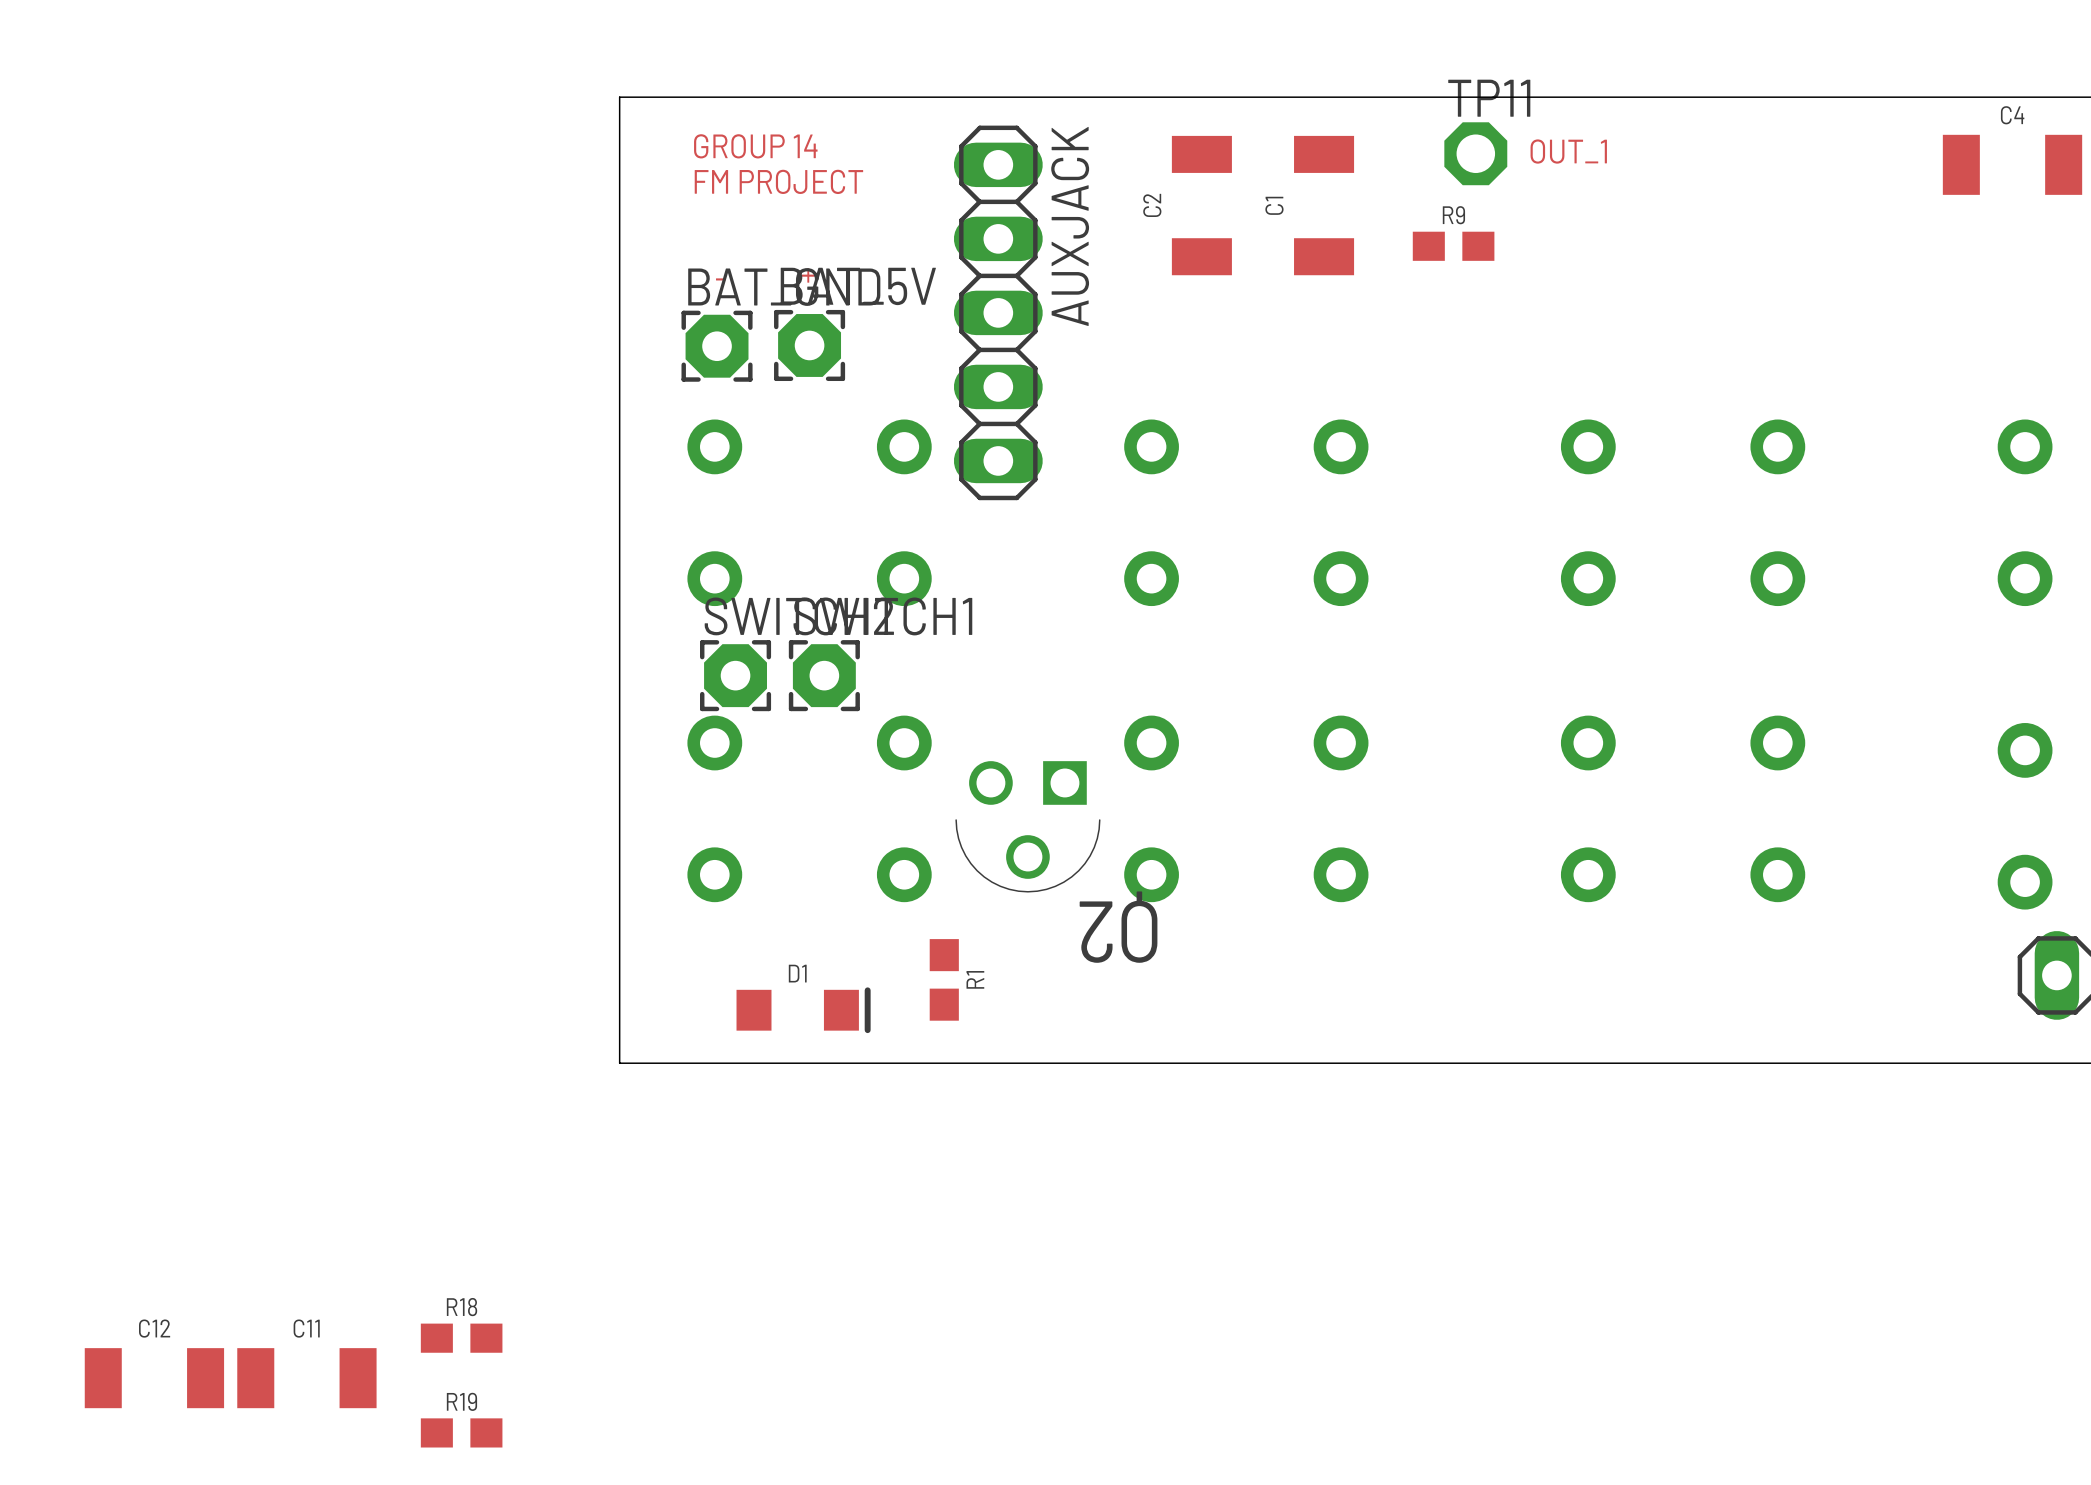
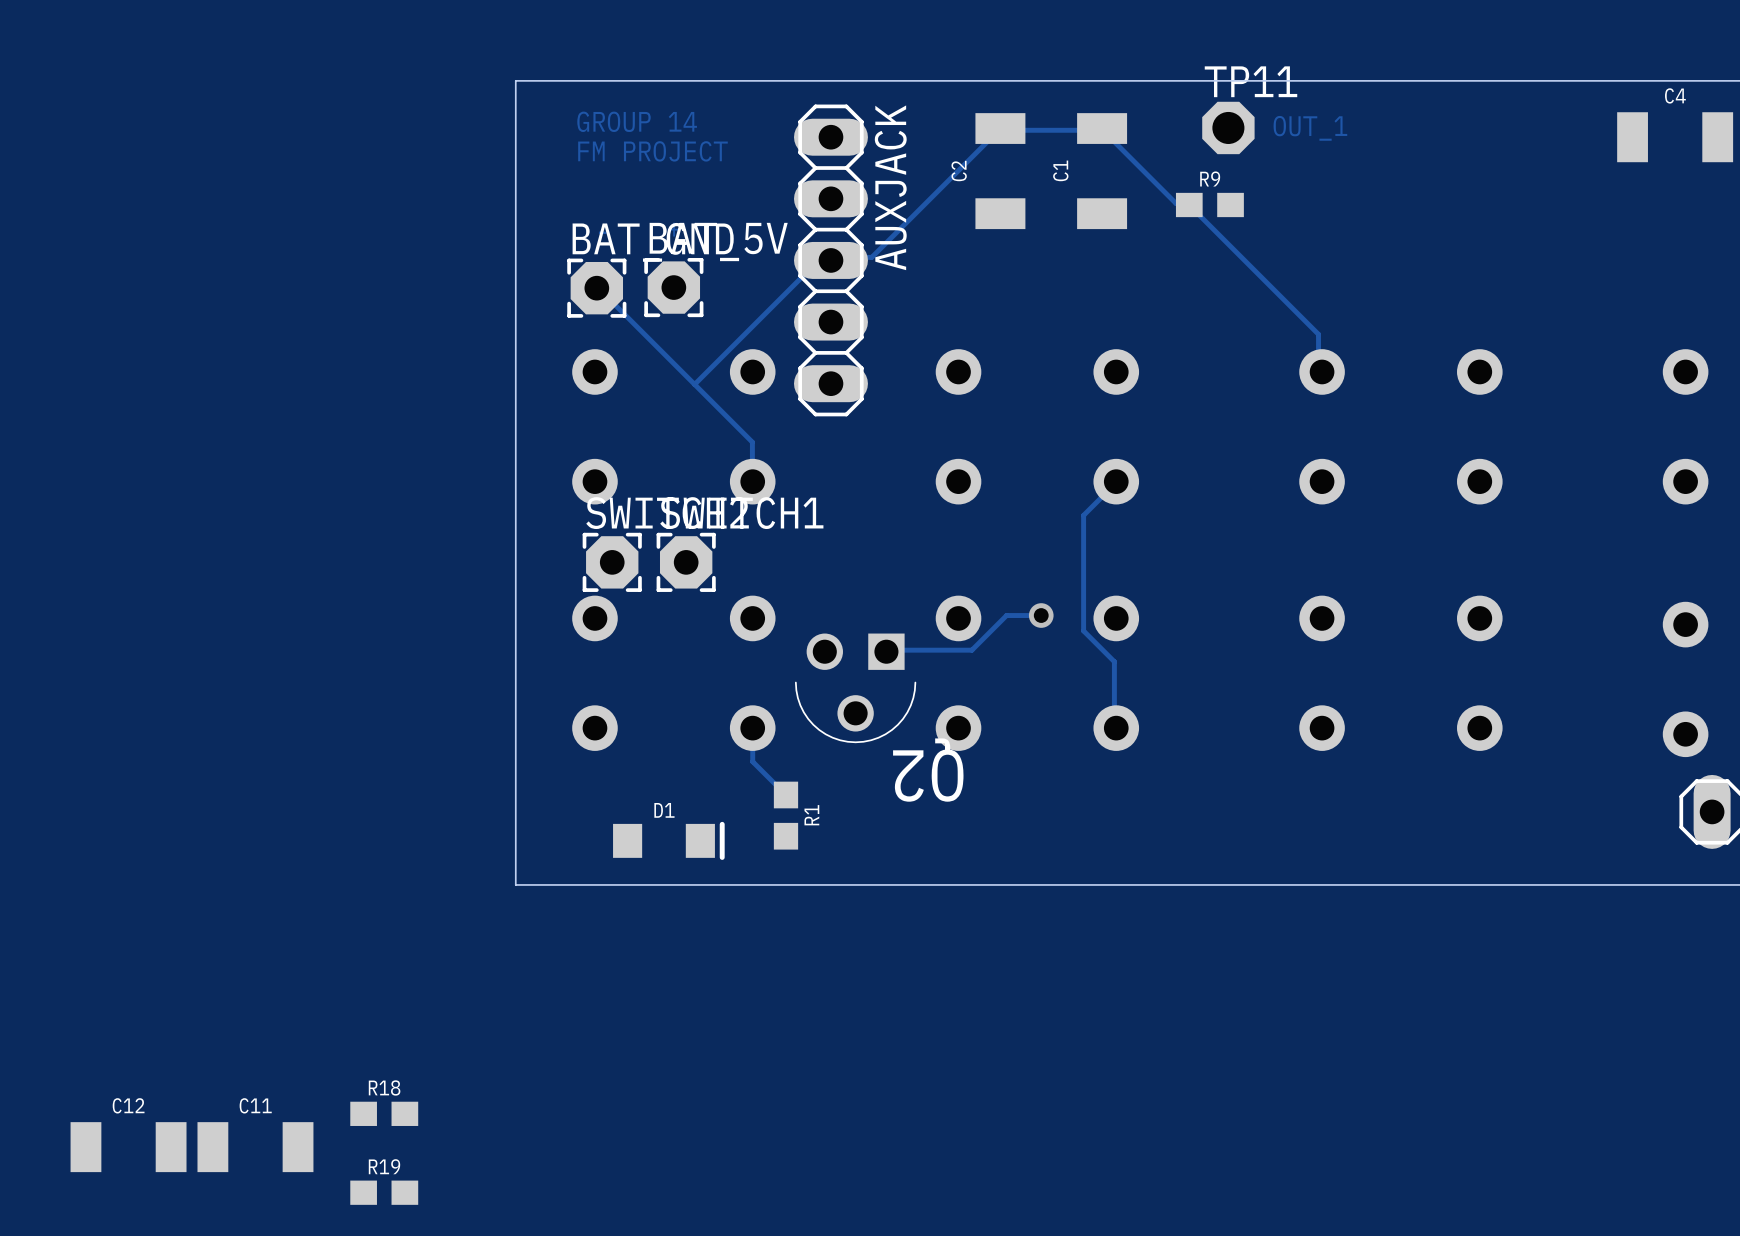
track: none -> (596, 288) (752, 442) (752, 481)
track: none -> (1322, 371) (1318, 369) (1318, 334) (1189, 204) (1176, 203) (1102, 128) (1099, 130) (1002, 130) (1000, 128) (871, 257) (833, 257) (829, 261) (817, 261) (694, 384)
track: none -> (1116, 481) (1083, 515) (1083, 630) (1114, 661) (1114, 727) (1116, 728)
track: none -> (1041, 615) (1006, 615) (971, 650) (887, 650) (886, 651)
via: none -> (1041, 615)
track: none -> (752, 731) (752, 728) (752, 761) (785, 795)

